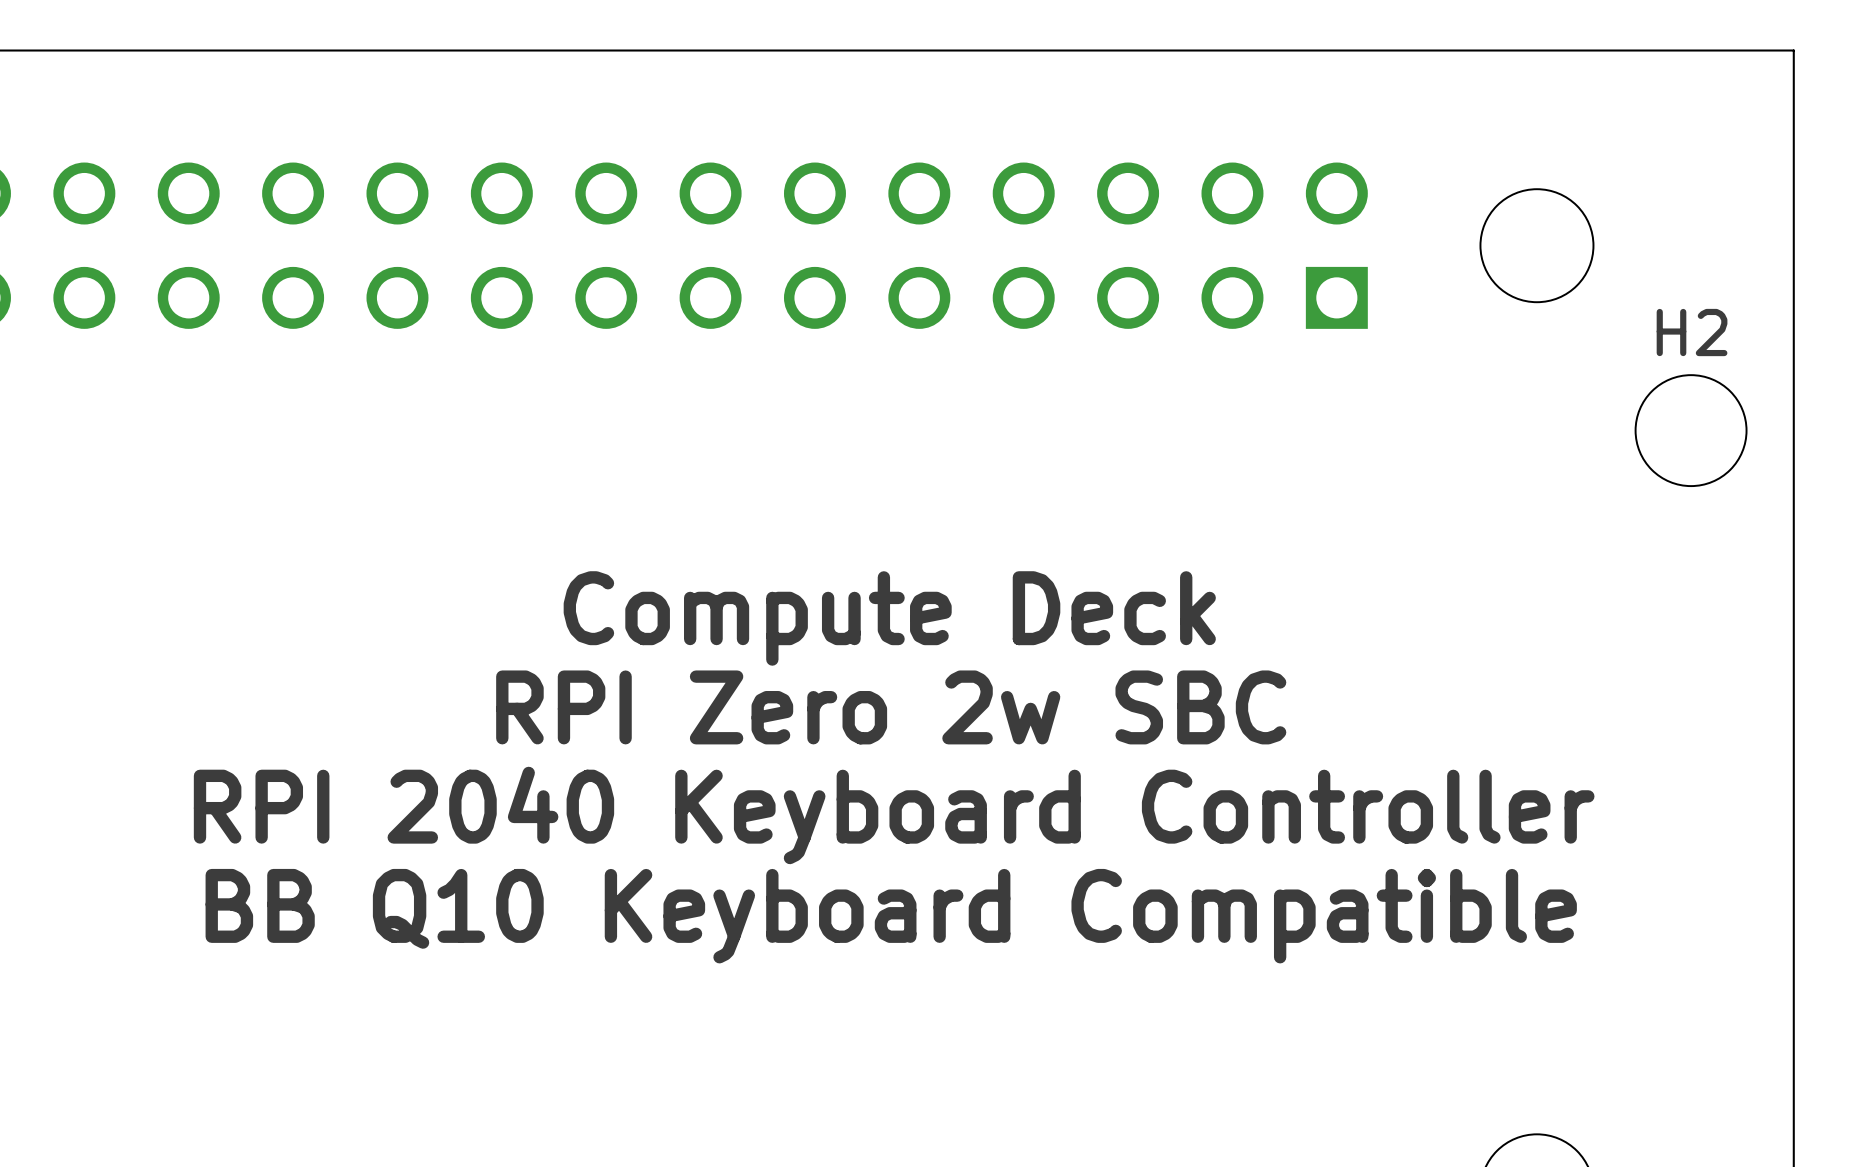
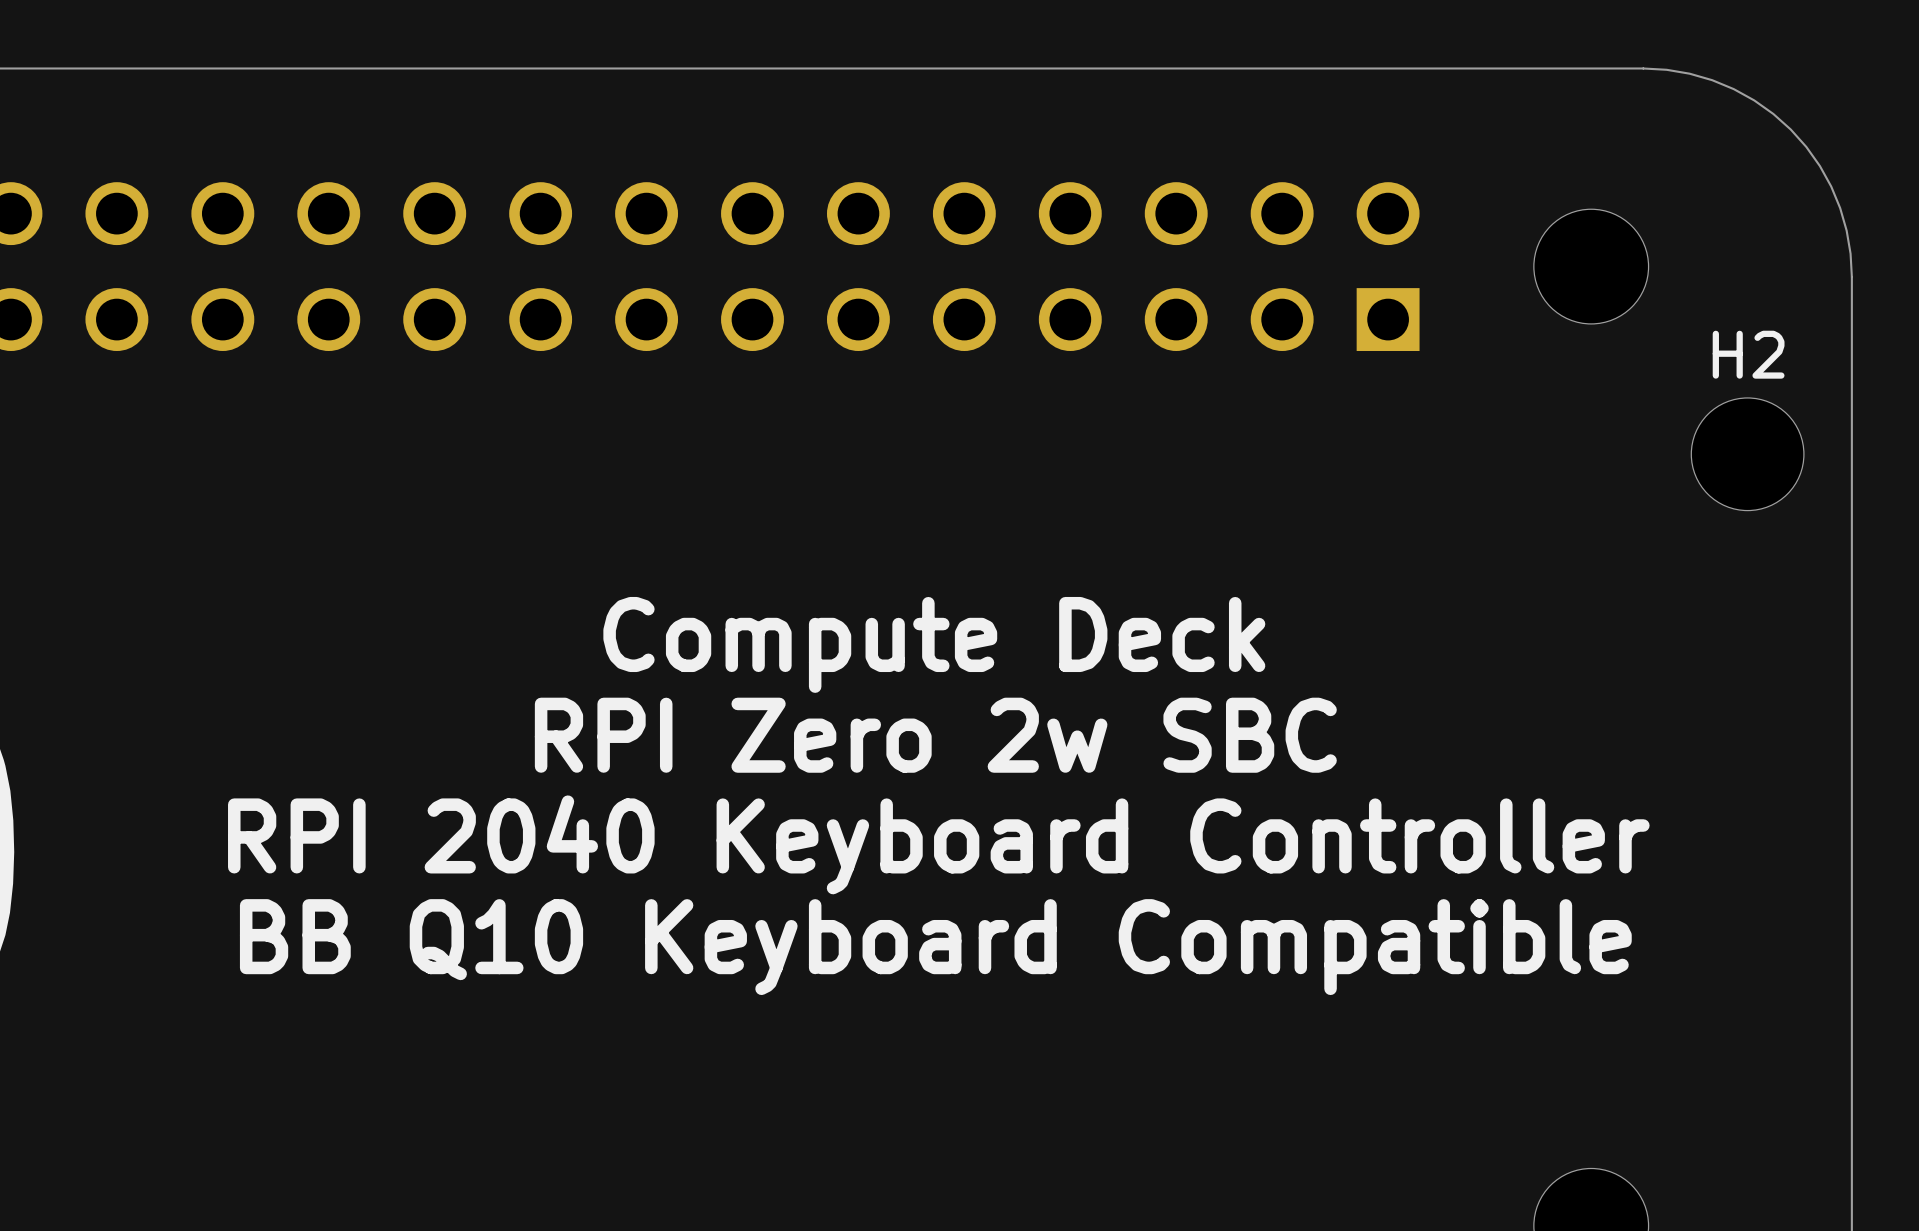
board edge: (1588, 50) (1793, 50) (1793, 255) -> (1643, 68) (1689, 73) (1712, 80) (1754, 100) (1790, 129) (1819, 166) (1840, 208) (1850, 253) (1851, 277)

